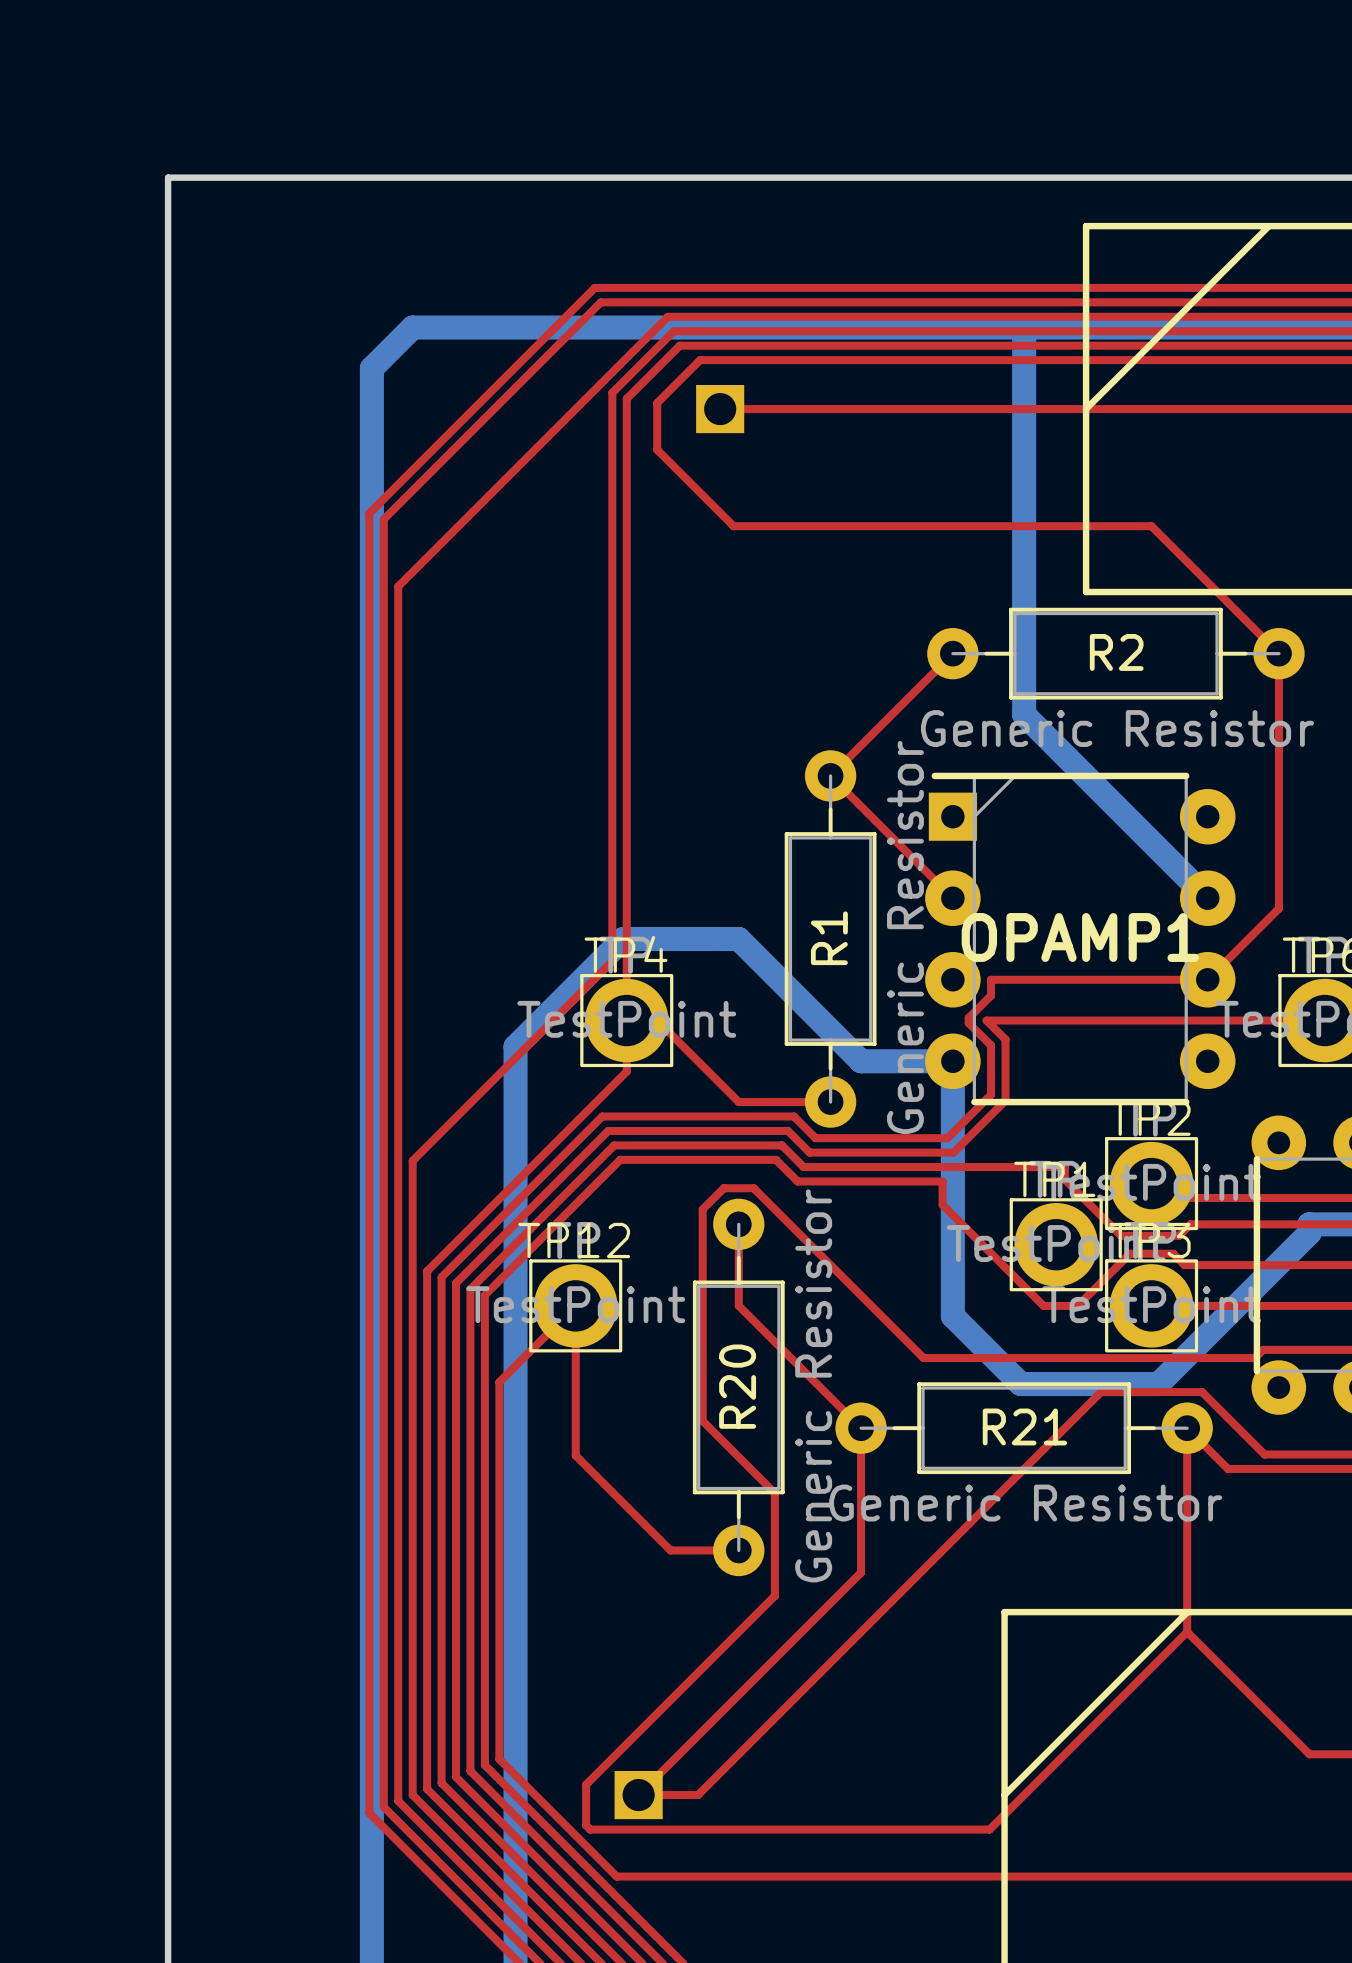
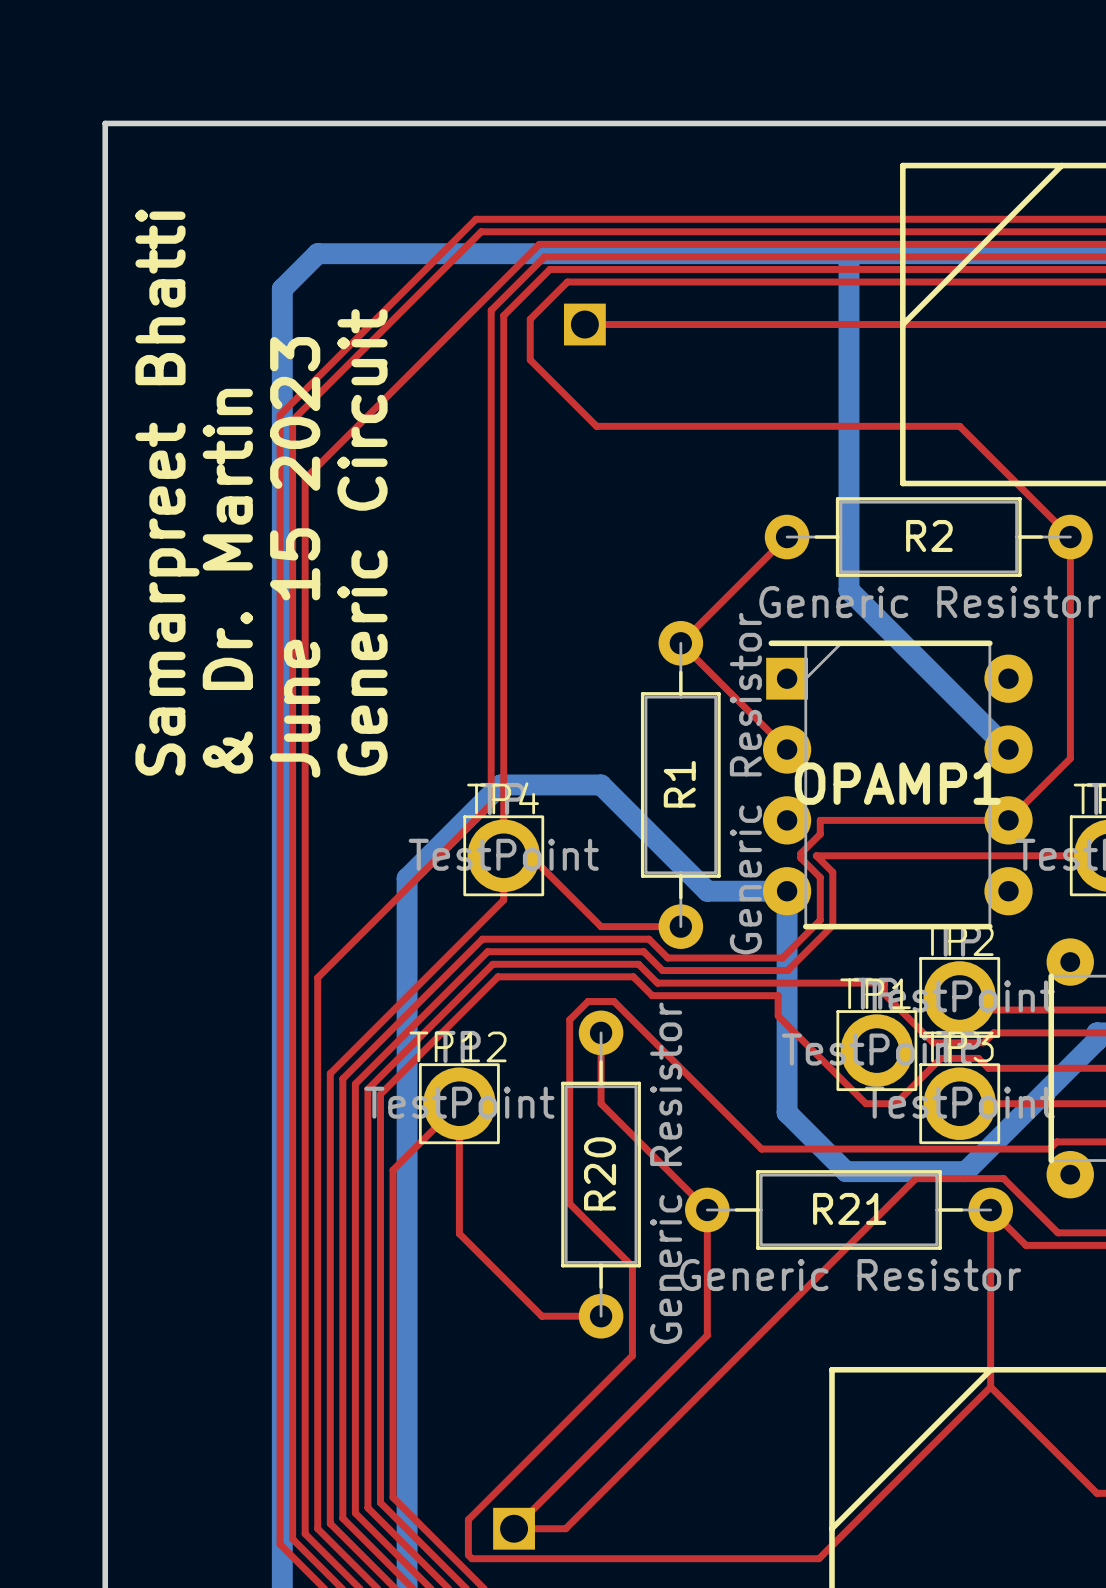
text: none -> Samarpreet Bhatti (167, 492)
text: none -> Generic Circuit (362, 542)
text: none -> June 15 2023 (295, 557)
text: none -> & Dr. Martin (227, 581)

